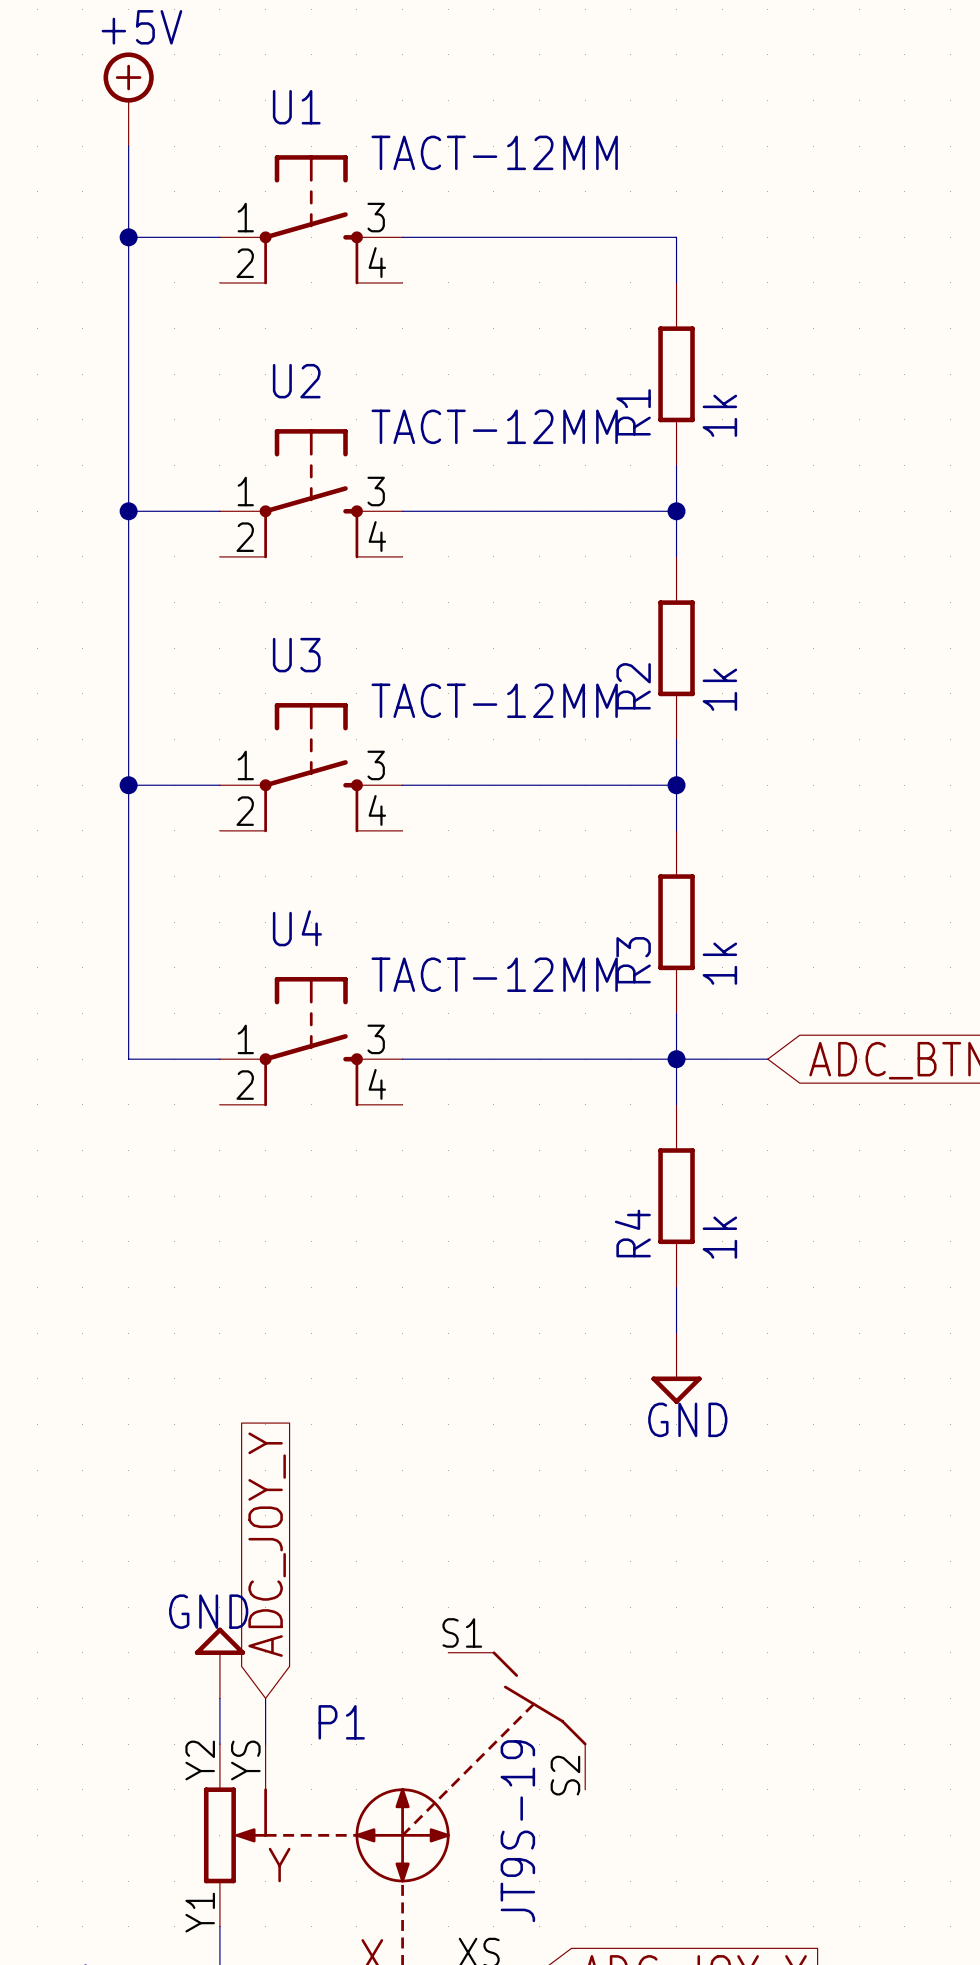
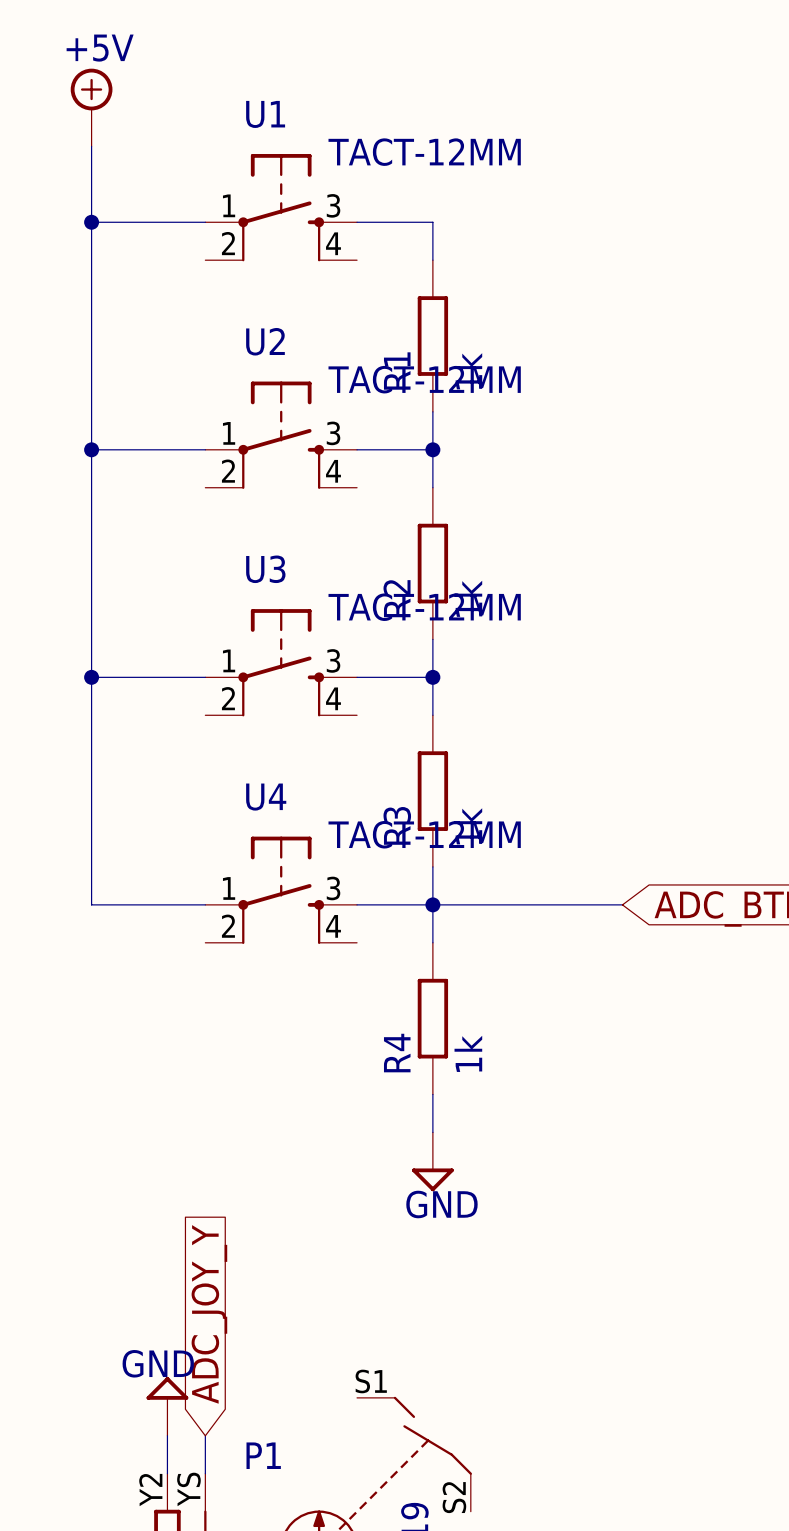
U1 position: (311, 219) -> (281, 207)
wire: (539, 237) (676, 237) (676, 282) -> (432, 222) (432, 260)
R1 position: (676, 374) -> (432, 336)
wire: (676, 465) (676, 556) -> (432, 411) (432, 487)
U2 position: (311, 493) -> (281, 435)
wire: (539, 511) (676, 511) -> none
junction: none -> (432, 449)
junction: (676, 511) -> none
R2 position: (676, 648) -> (432, 563)
wire: (676, 739) (676, 830) -> (432, 639) (432, 715)
U3 position: (311, 767) -> (281, 662)
wire: (539, 785) (676, 785) -> none
junction: none -> (432, 677)
junction: (676, 785) -> none
R3 position: (676, 922) -> (432, 791)
wire: (676, 1013) (676, 1104) -> (432, 866) (432, 942)
U4 position: (311, 1041) -> (281, 890)
junction: none -> (432, 904)
junction: (676, 1059) -> none
R4 position: (676, 1196) -> (432, 1018)
wire: (676, 1287) (676, 1333) -> (432, 1094) (432, 1132)
power symbol position: GND (676, 1368) -> GND (432, 1161)

